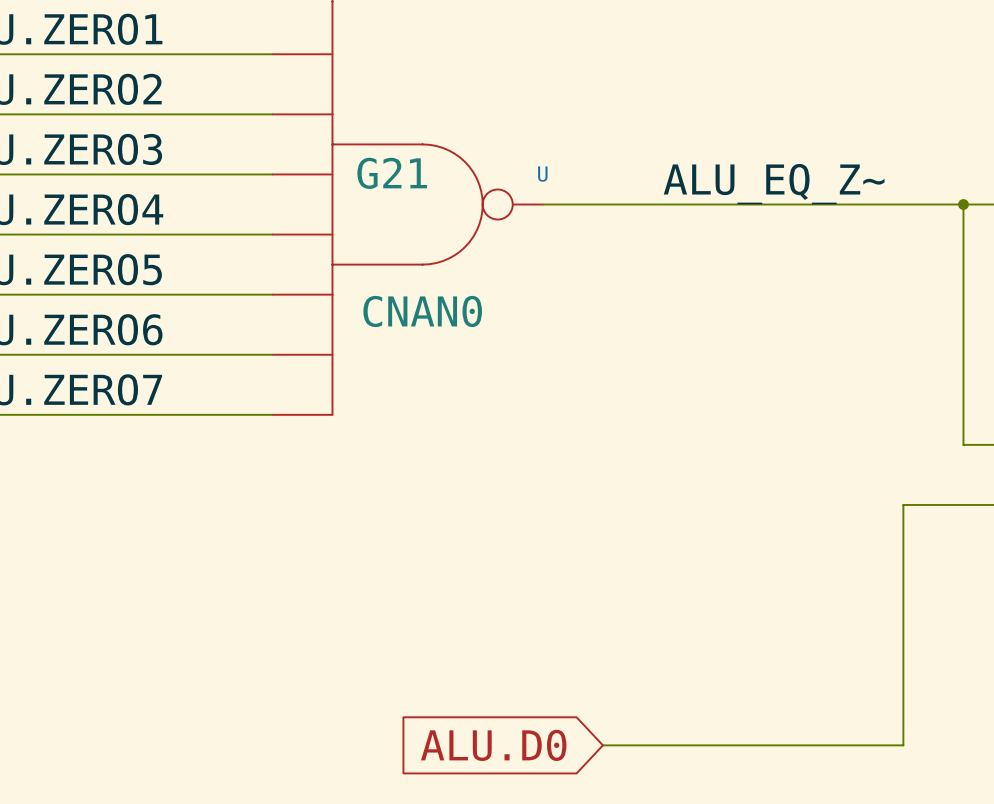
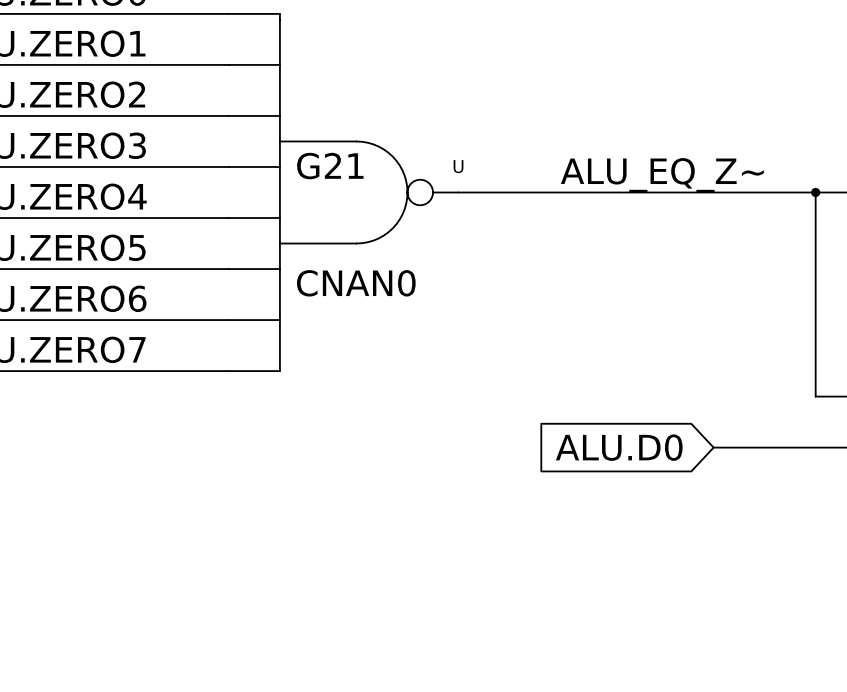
wire: (903, 504) (903, 745) (602, 745) -> (764, 447) (713, 447)
global label: none -> ALU.D0 (619, 447)
global label: ALU.D0 (493, 745) -> none

